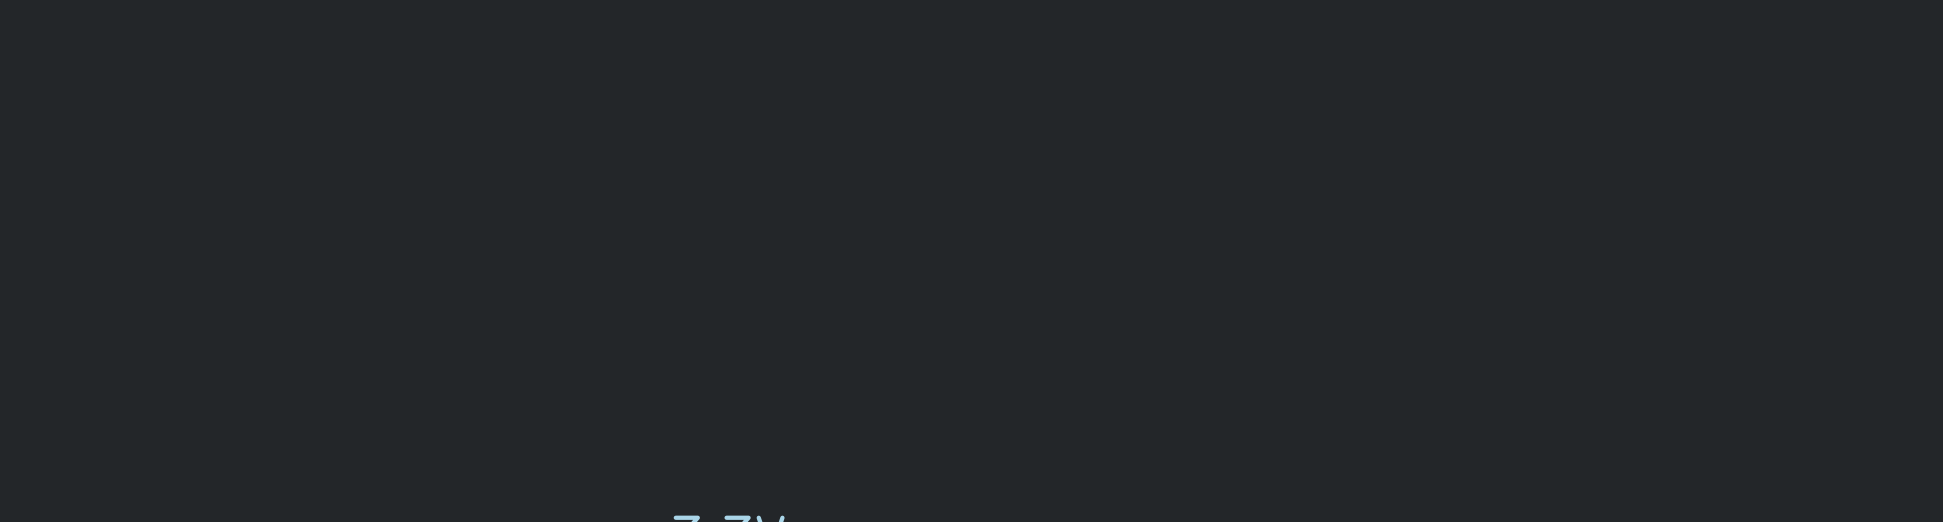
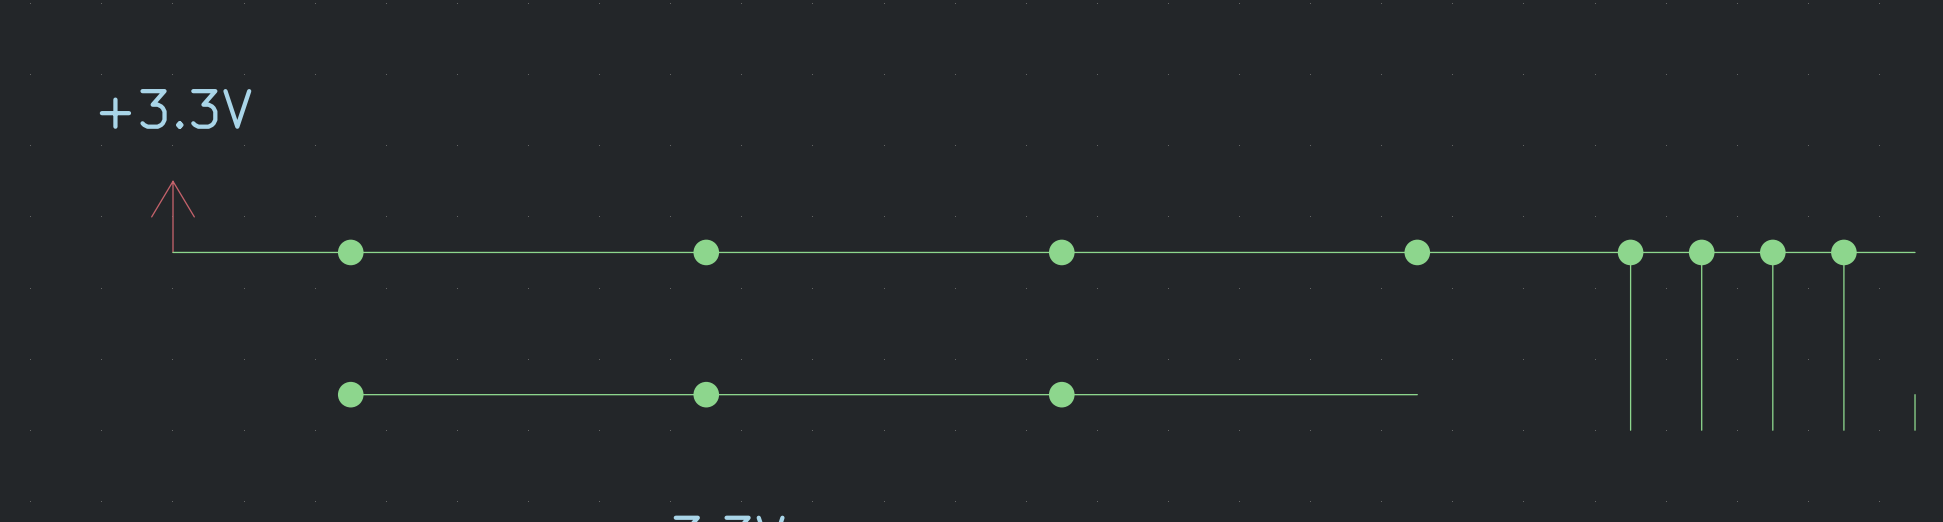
power symbol: none -> +3.3V (172, 216)
wire: none -> (172, 252) (1915, 252)
junction: none -> (350, 252)
junction: none -> (706, 252)
junction: none -> (1061, 252)
junction: none -> (1417, 252)
wire: none -> (1630, 252) (1630, 430)
junction: none -> (1630, 252)
wire: none -> (1701, 252) (1701, 430)
junction: none -> (1701, 252)
wire: none -> (1772, 252) (1772, 430)
junction: none -> (1772, 252)
wire: none -> (1843, 252) (1843, 430)
junction: none -> (1843, 252)
wire: none -> (350, 394) (1417, 394)
junction: none -> (350, 394)
junction: none -> (706, 394)
junction: none -> (1061, 394)
wire: none -> (1915, 394) (1915, 430)

